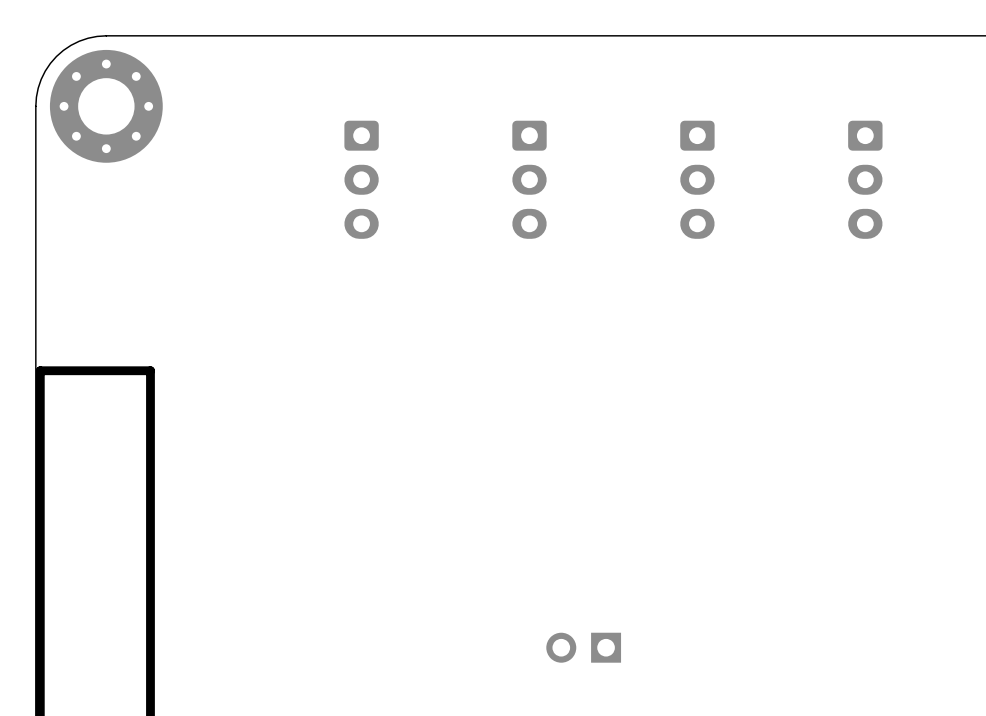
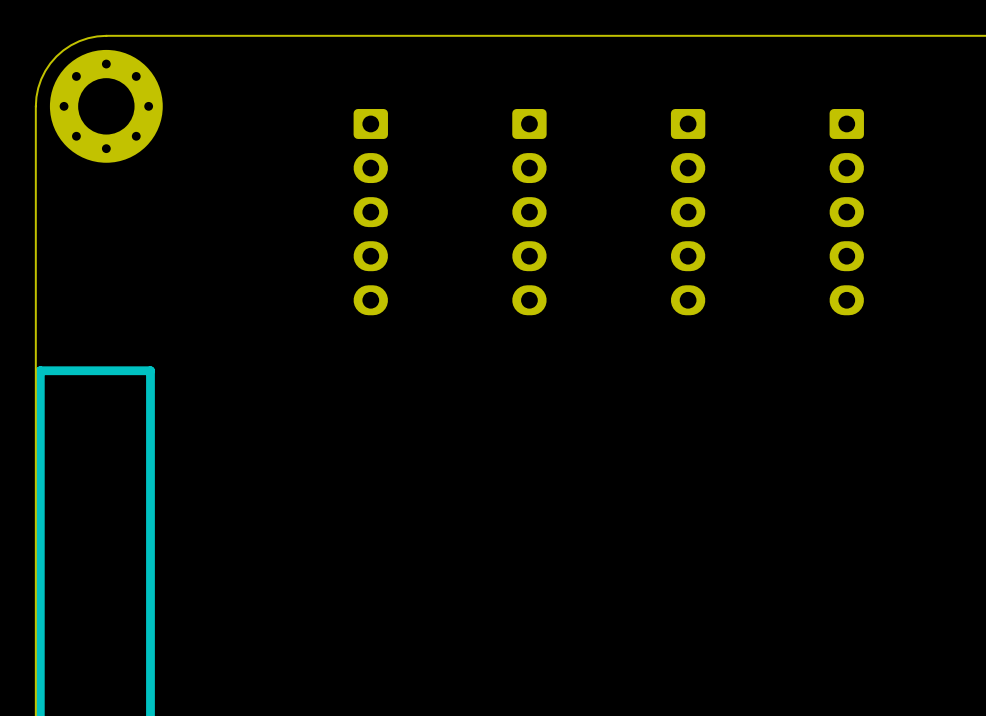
part: (361, 179) -> none
part: (529, 179) -> none
part: (697, 179) -> none
part: (865, 179) -> none
part: none -> (370, 212)
part: none -> (529, 212)
part: none -> (688, 212)
part: none -> (846, 212)
part: (583, 647) -> none

